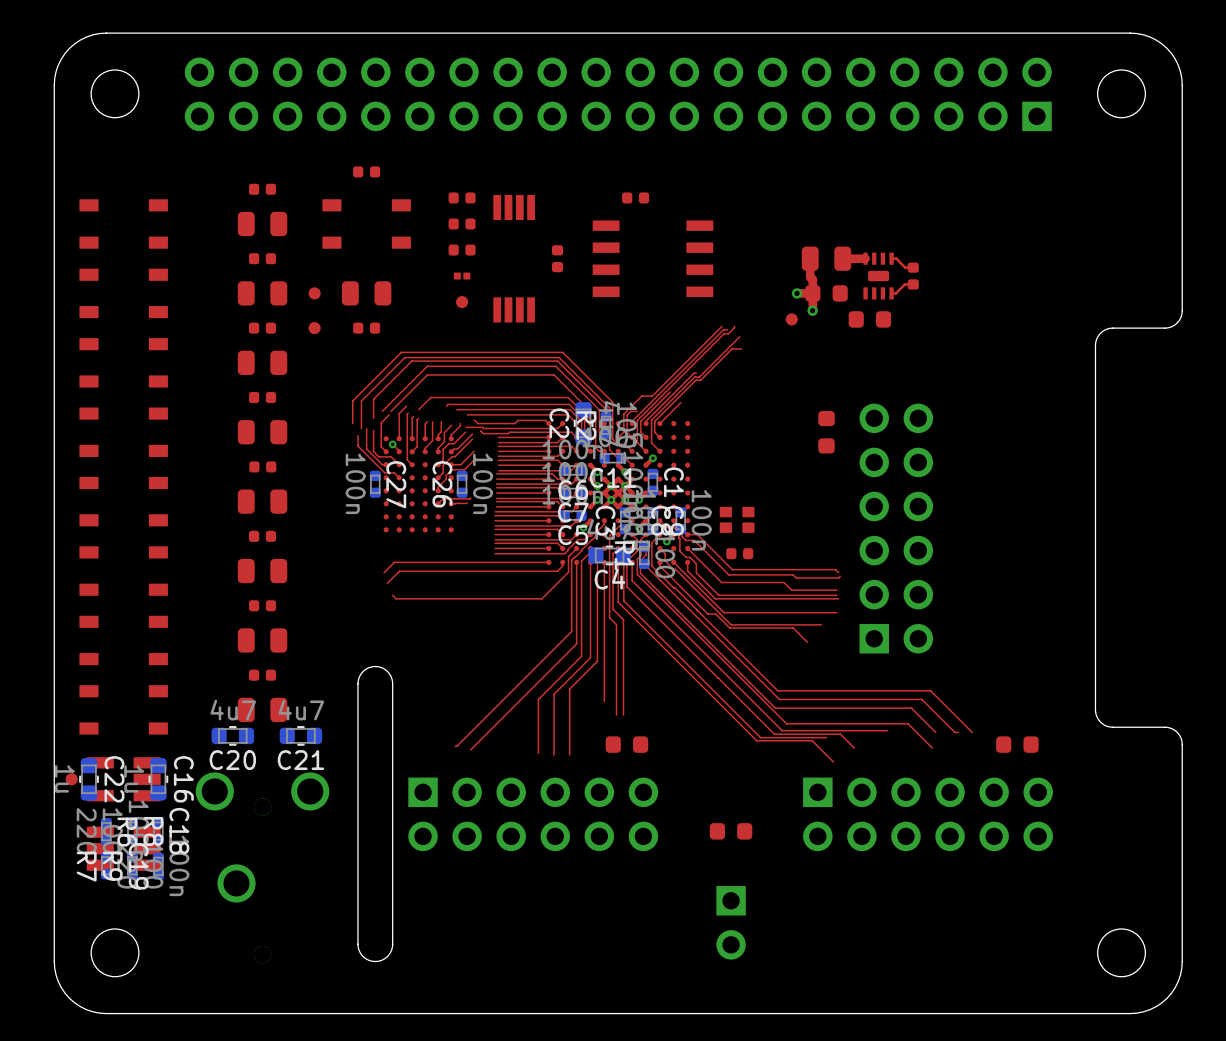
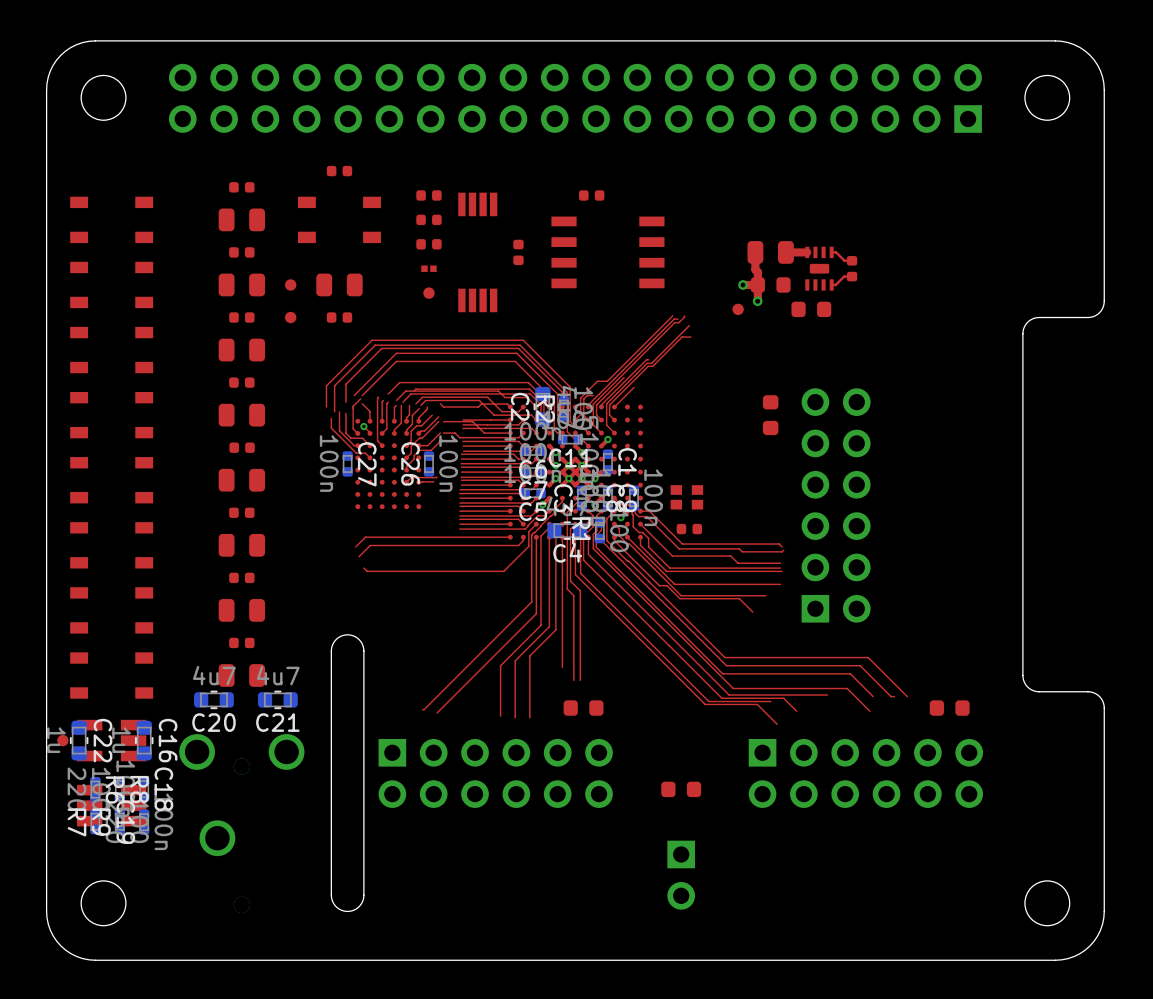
top track: (406, 406) (399, 413) (399, 428) -> (362, 403) (369, 411)
top track: none -> (424, 393) (411, 393) (402, 402)
top track: (567, 414) (467, 414) -> (528, 398) (505, 397) (498, 391) (405, 391) (396, 400)
top track: (465, 427) (539, 428) -> (415, 403) (422, 397) (487, 397) (501, 411)
top track: (481, 430) (483, 433) (531, 432) -> (420, 405) (425, 400) (479, 400) (494, 415)
top track: none -> (443, 433) (455, 433) (459, 437) (462, 437)
top track: (521, 451) (498, 451) -> (484, 433) (472, 421) (443, 421)

